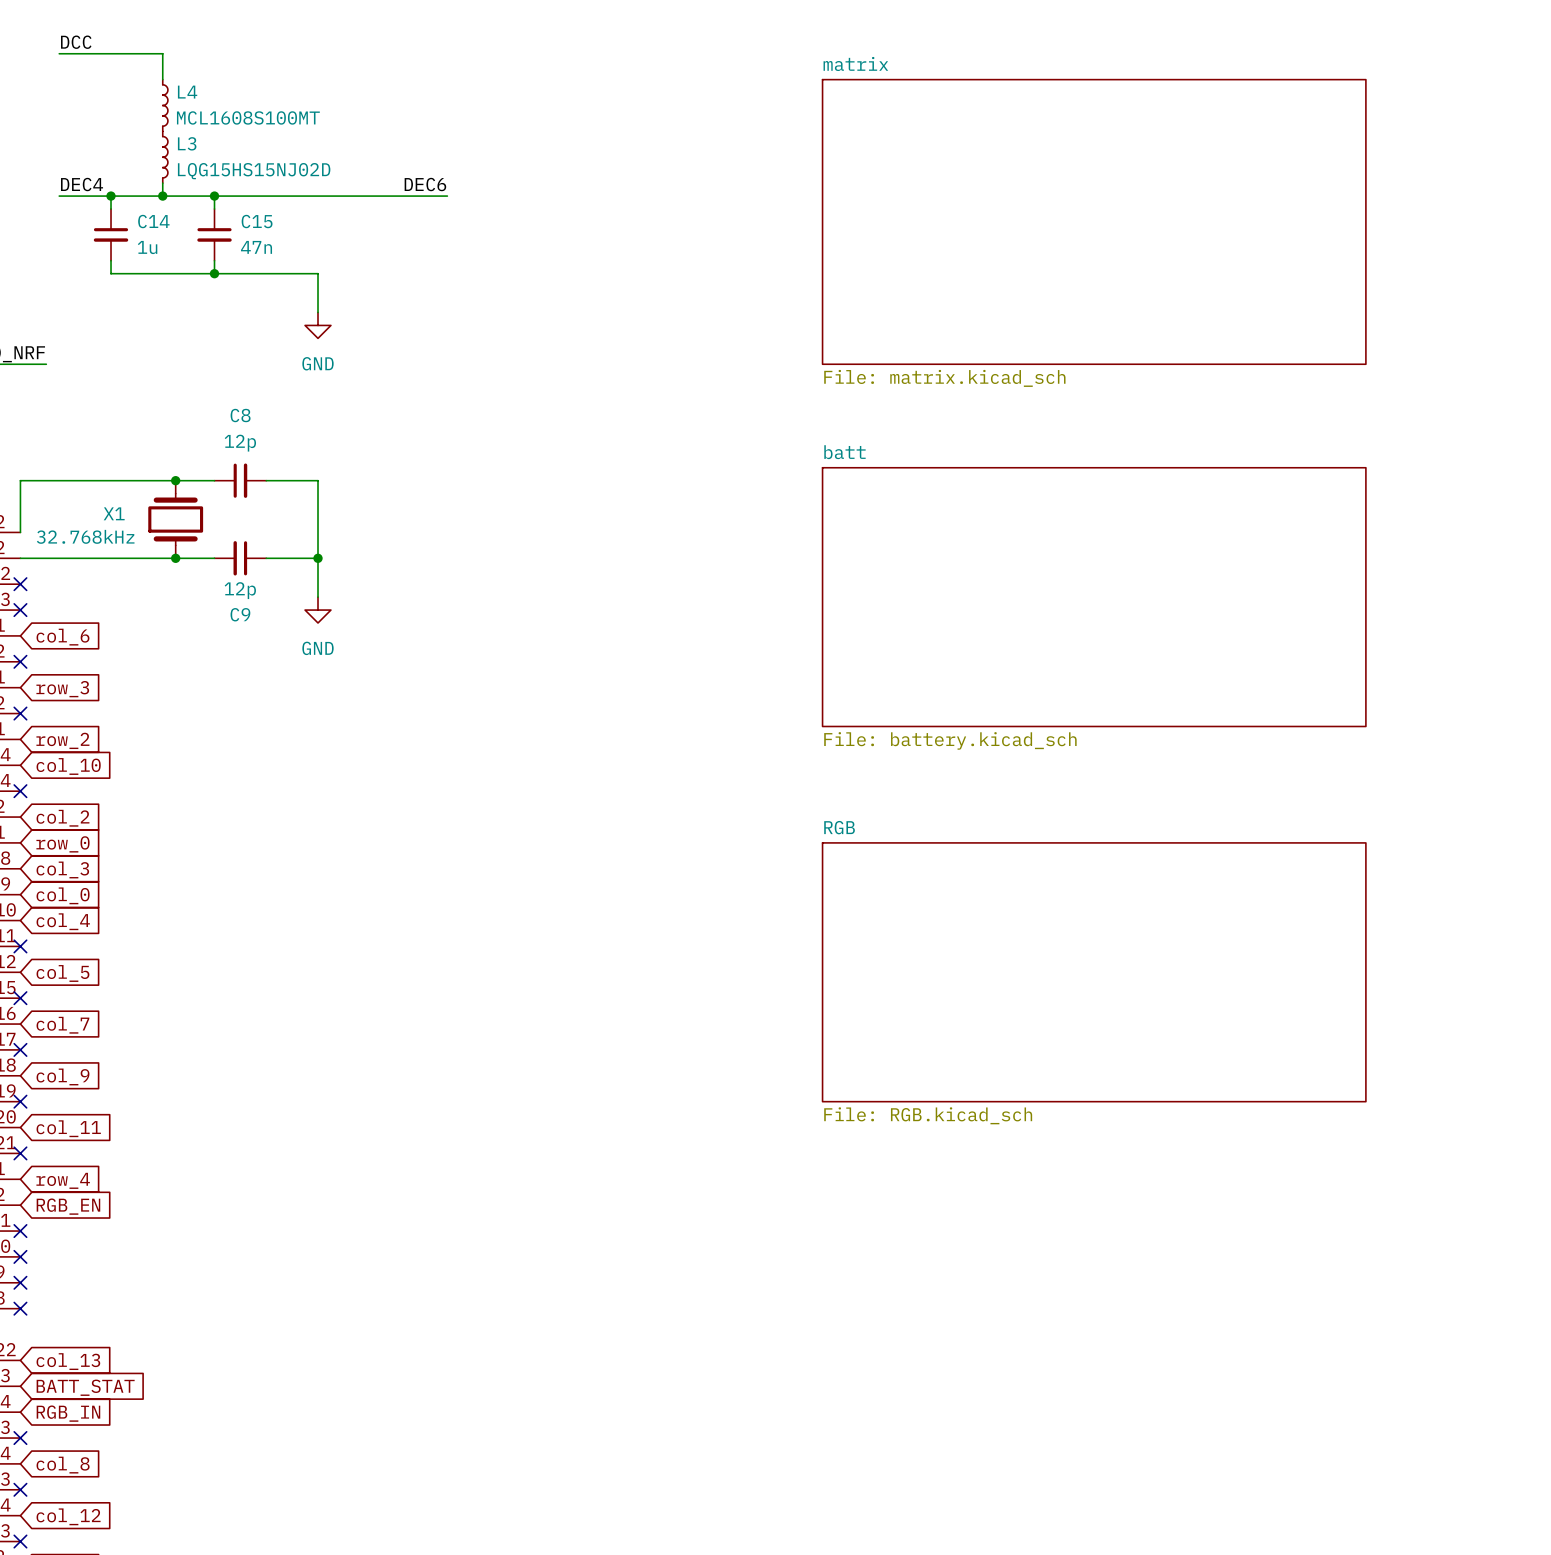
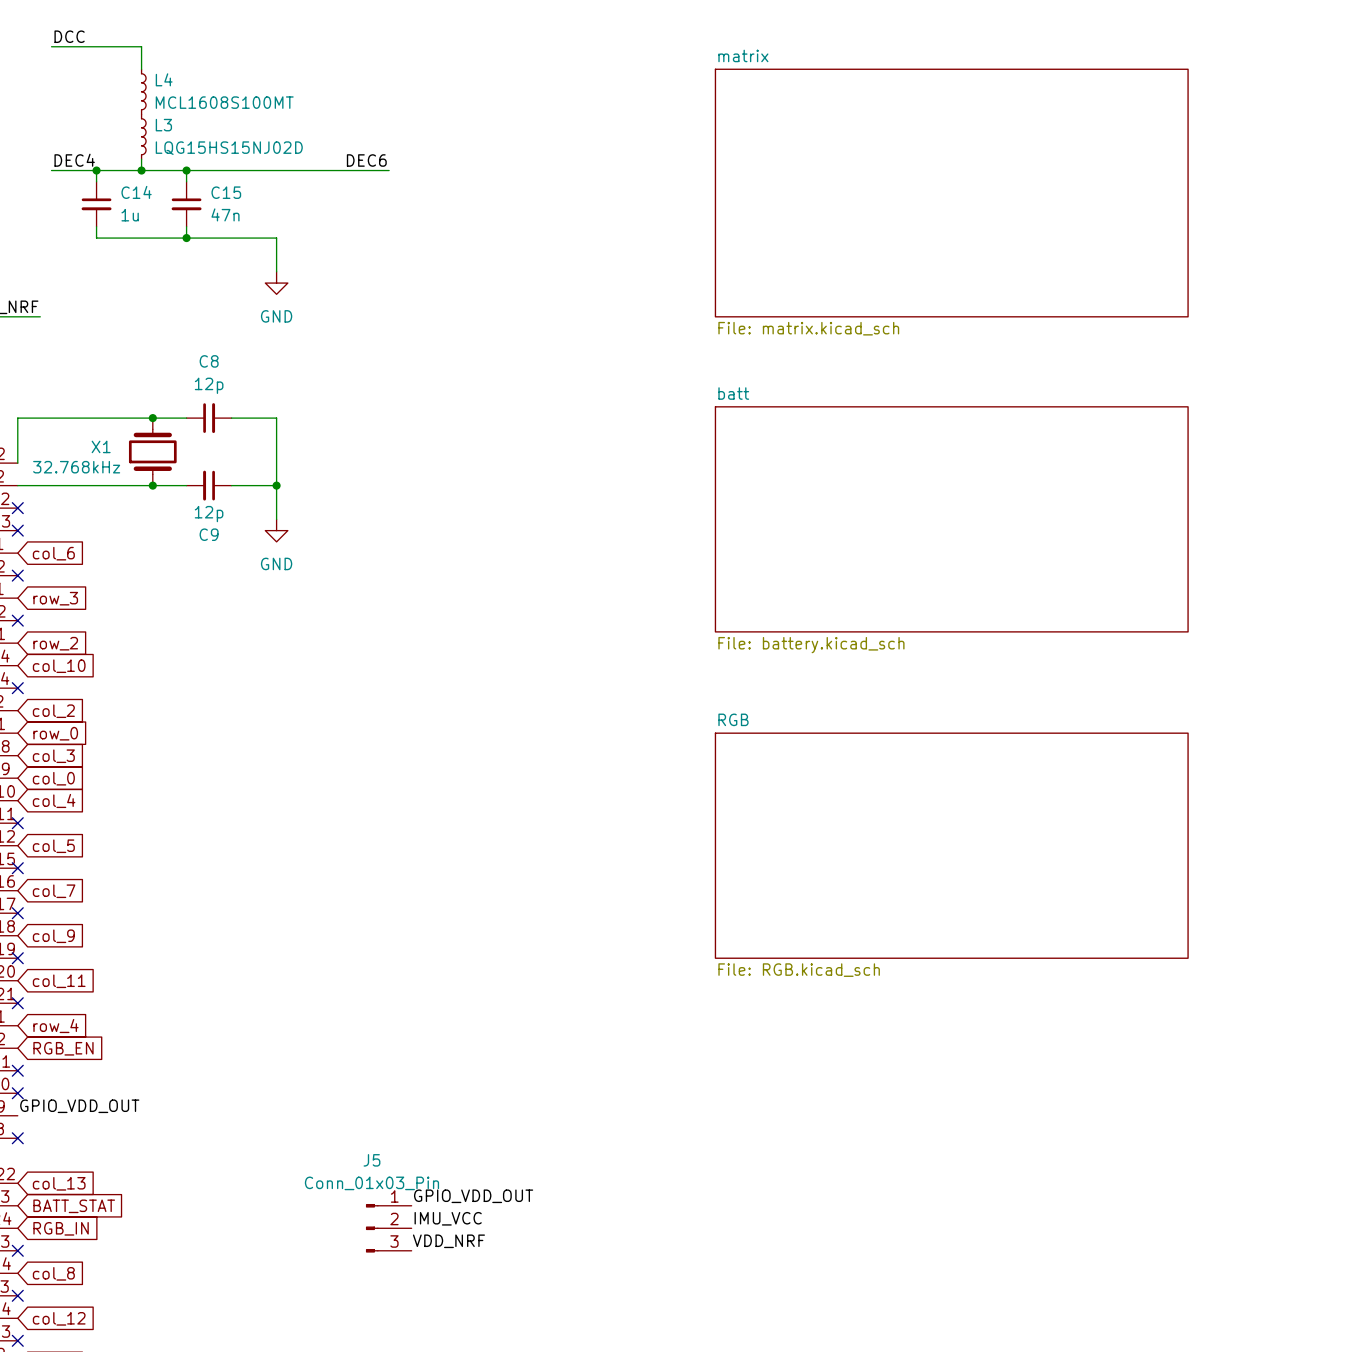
label: none -> GPIO_VDD_OUT (79, 1106)
no-connect mark: (20, 1282) -> none
label: none -> GPIO_VDD_OUT (473, 1196)
label: none -> IMU_VCC (448, 1218)
J5: none -> Conn_01x03_Pin (388, 1228)
label: none -> VDD_NRF (448, 1241)

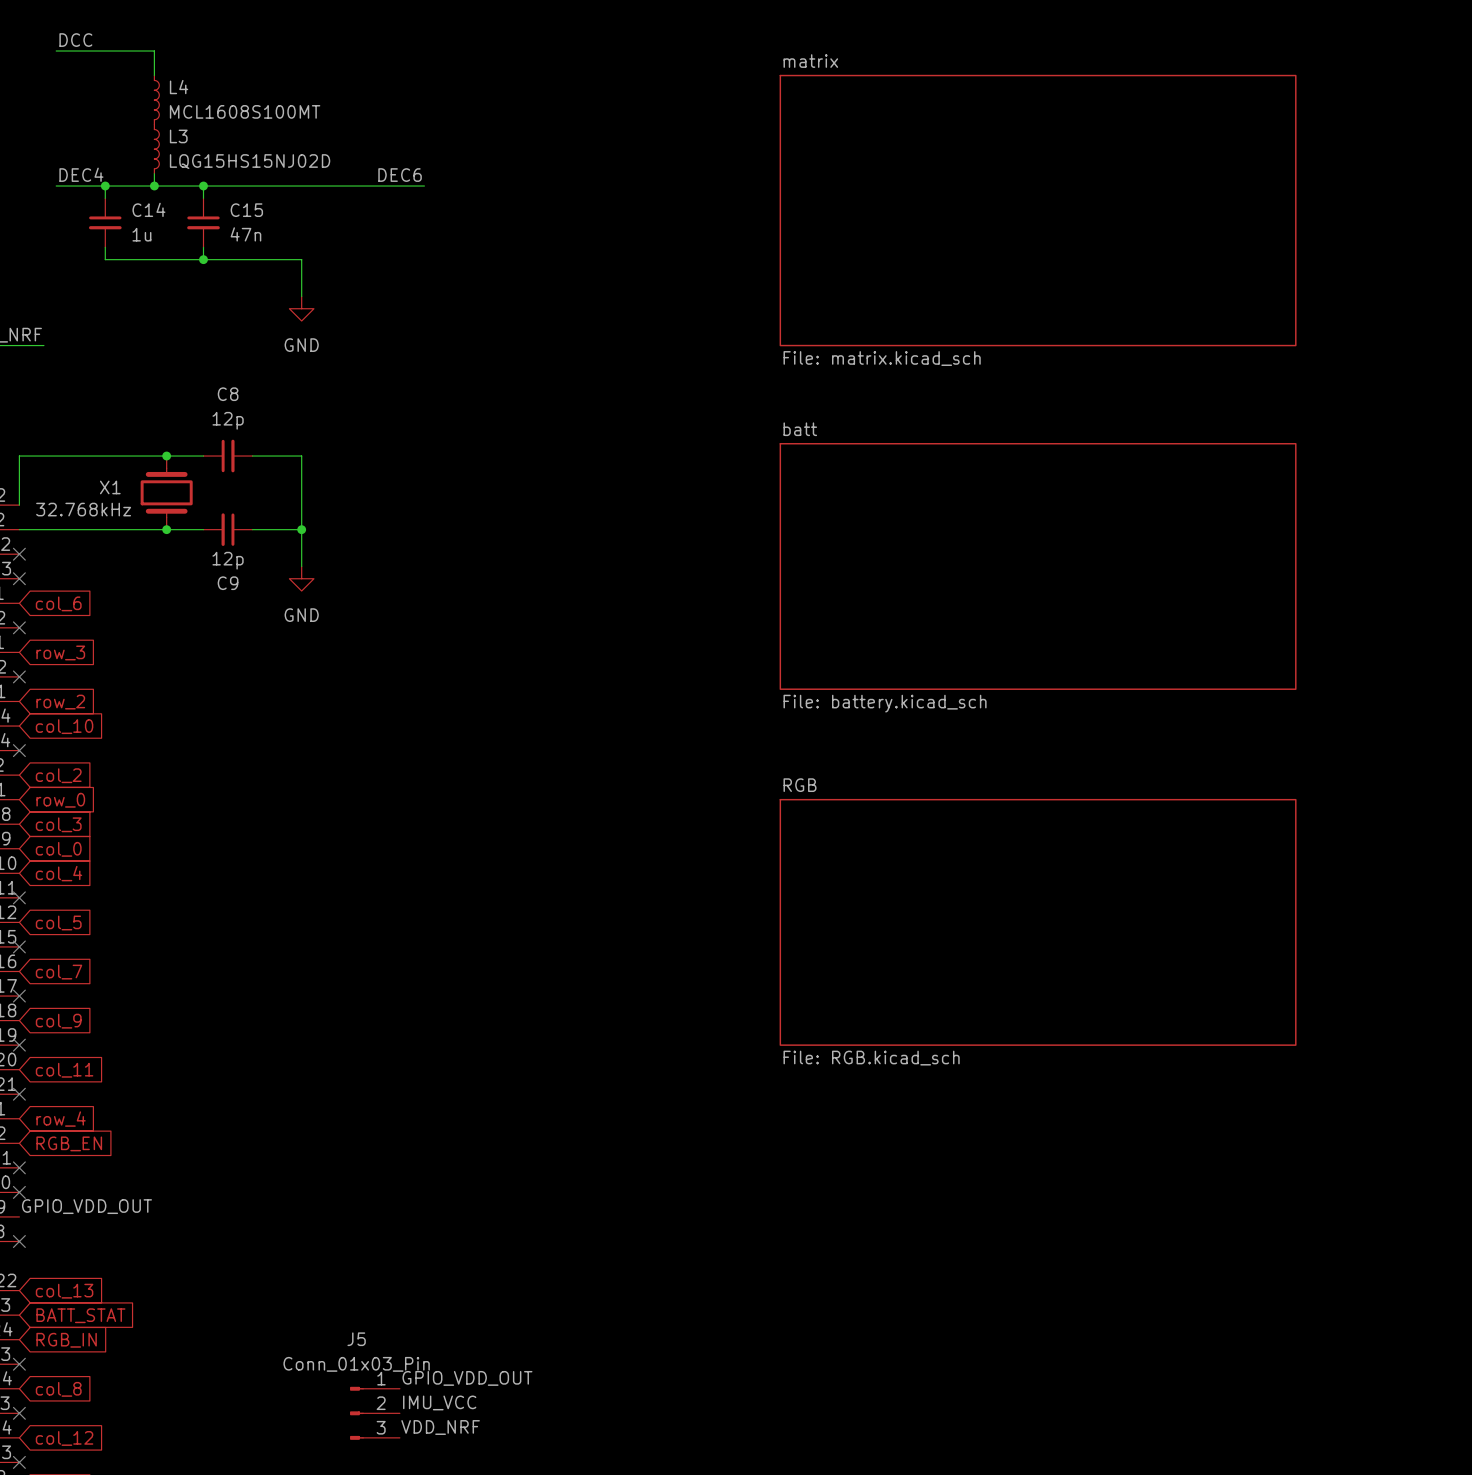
label position: GPIO_VDD_OUT (473, 1196) -> GPIO_VDD_OUT (467, 1378)
label position: IMU_VCC (448, 1218) -> IMU_VCC (439, 1402)
J5 position: (388, 1228) -> (374, 1413)
label position: VDD_NRF (448, 1241) -> VDD_NRF (440, 1427)

